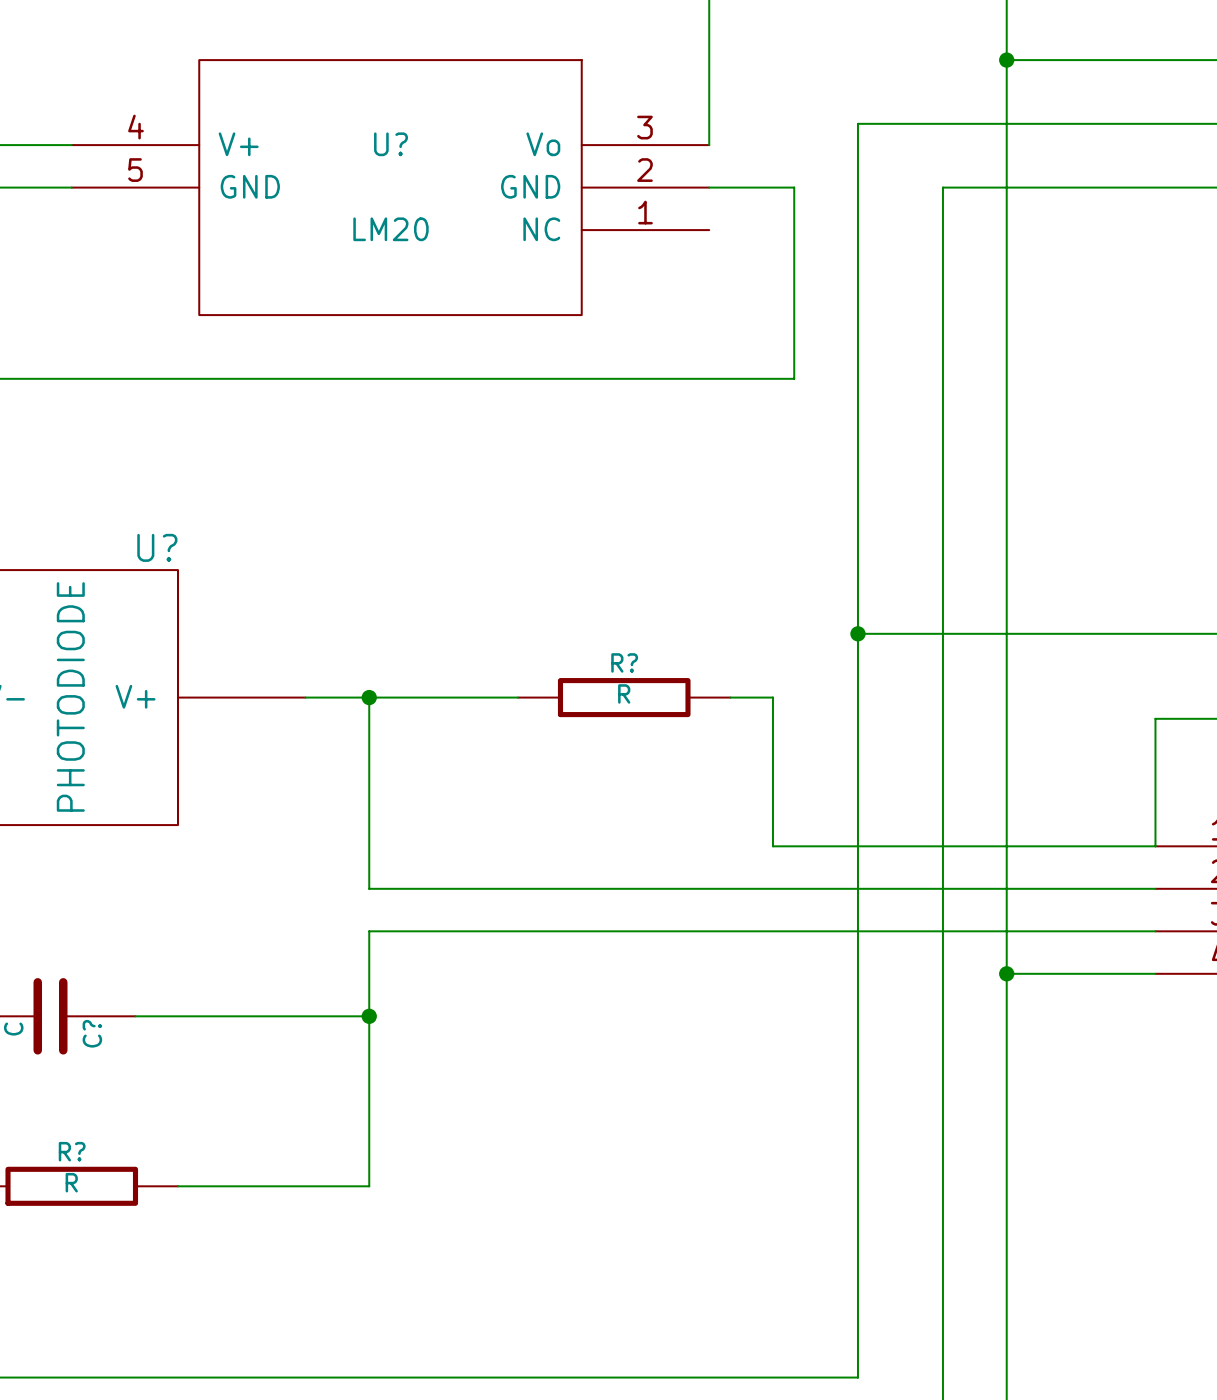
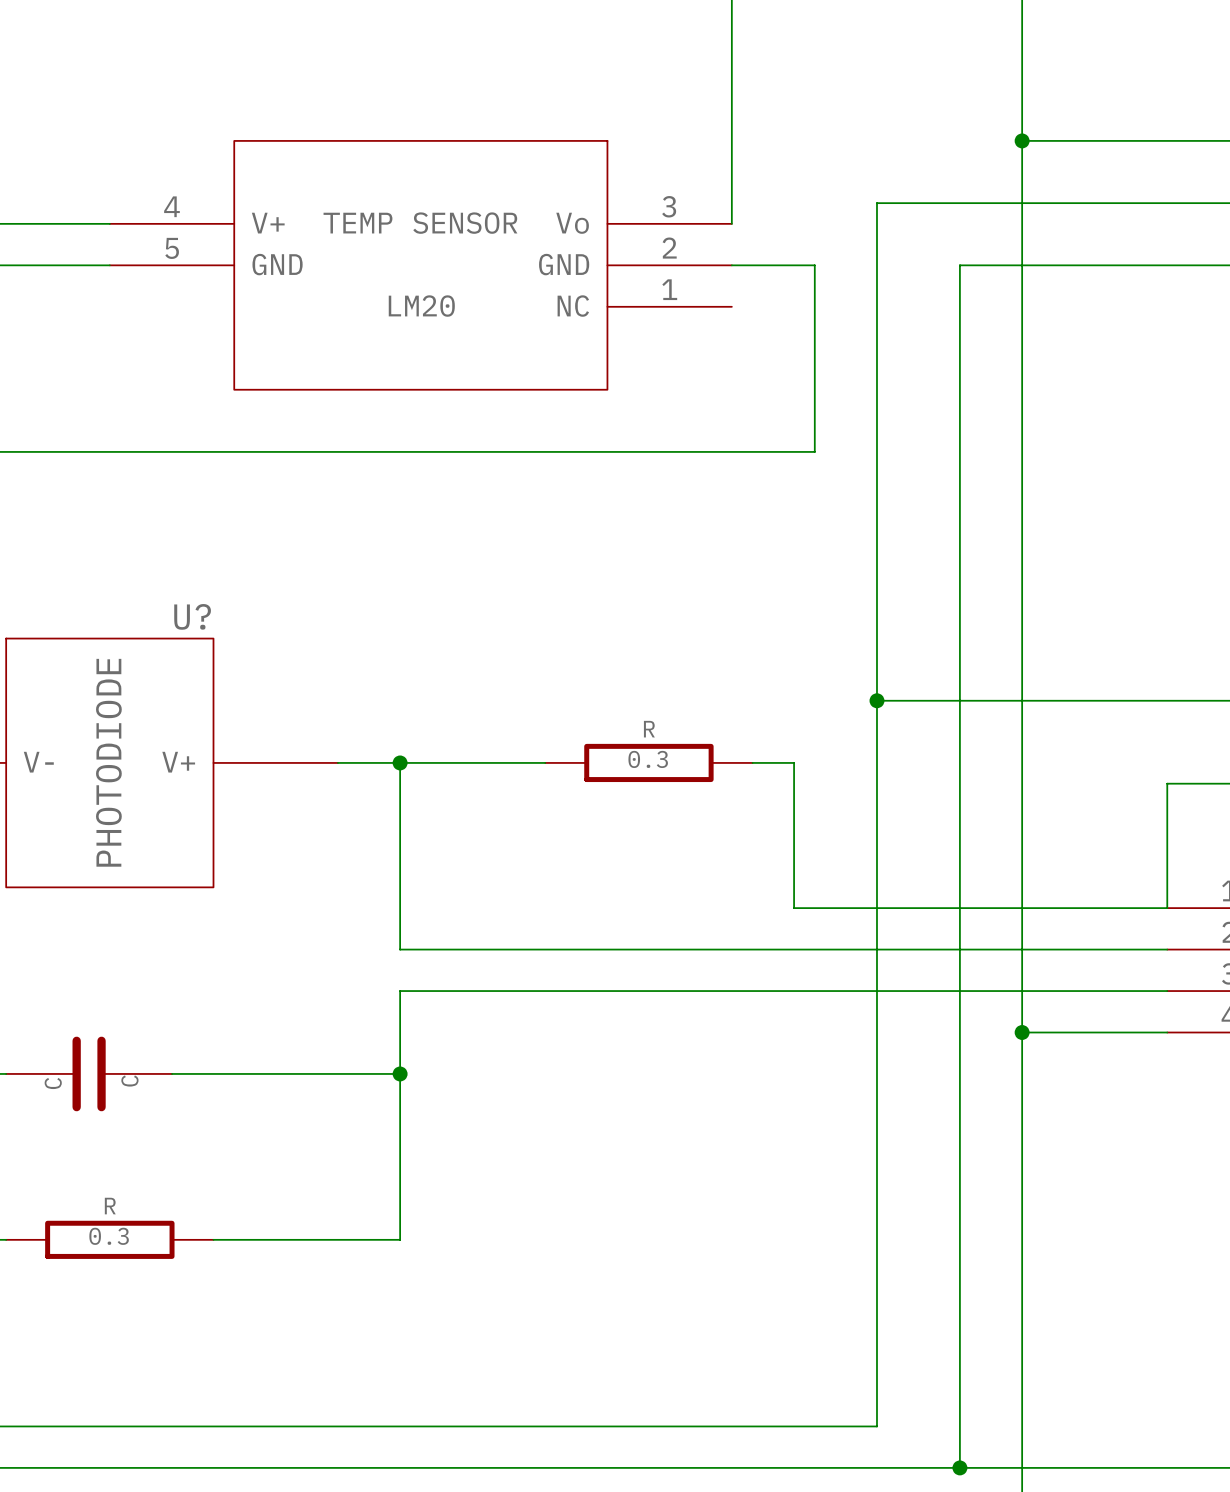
U? name: U? (391, 144) -> TEMP SENSOR (420, 223)
R? name: R? (624, 662) -> R (649, 729)
R? value: R (624, 693) -> 0.3 (648, 759)
C? name: C? (92, 1033) -> C (129, 1081)
R? name: R? (72, 1151) -> R (110, 1206)
R? value: R (71, 1182) -> 0.3 (109, 1236)

